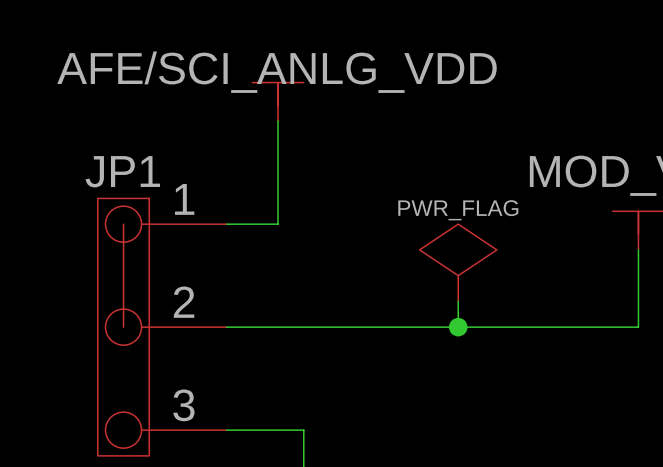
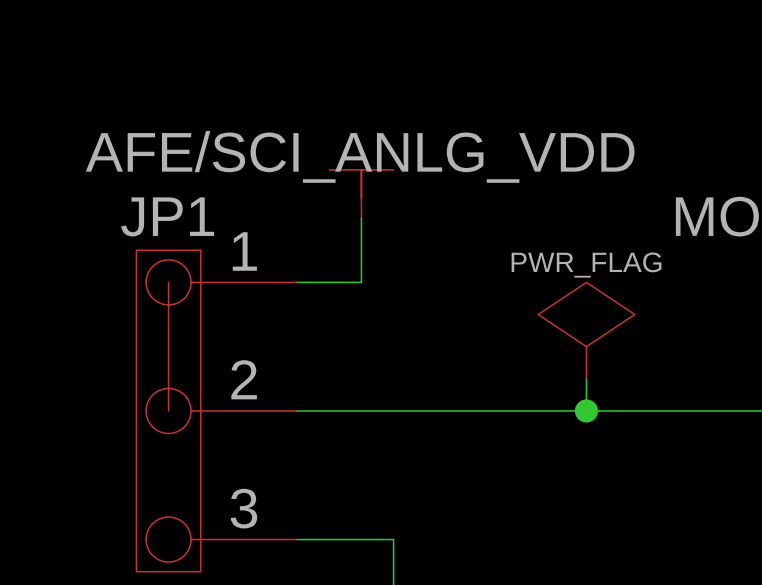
power symbol position: AFE/SCI_ANLG_VDD (278, 101) -> AFE/SCI_ANLG_VDD (361, 193)

